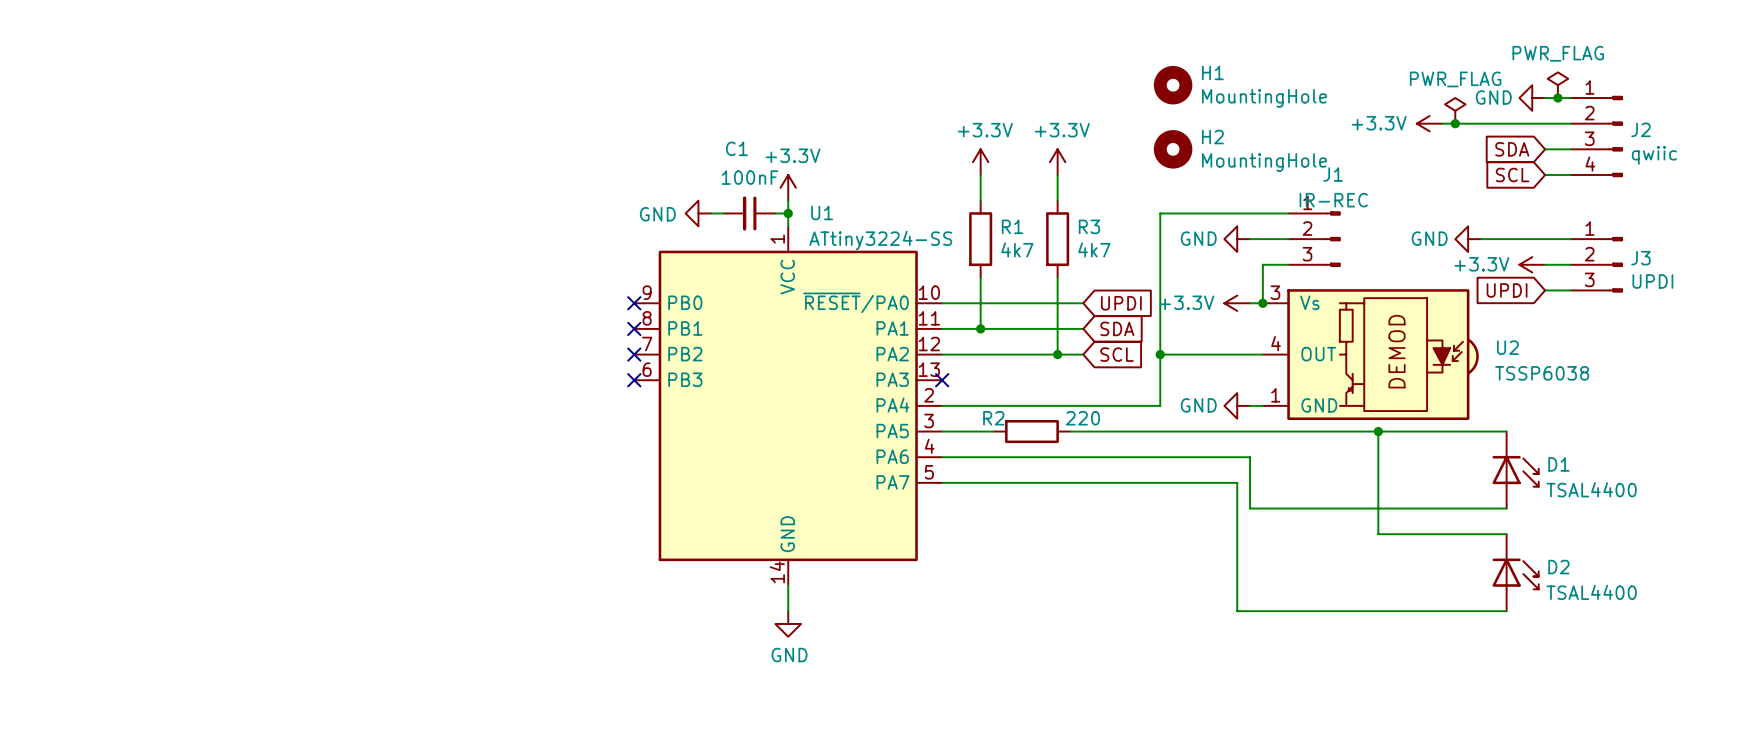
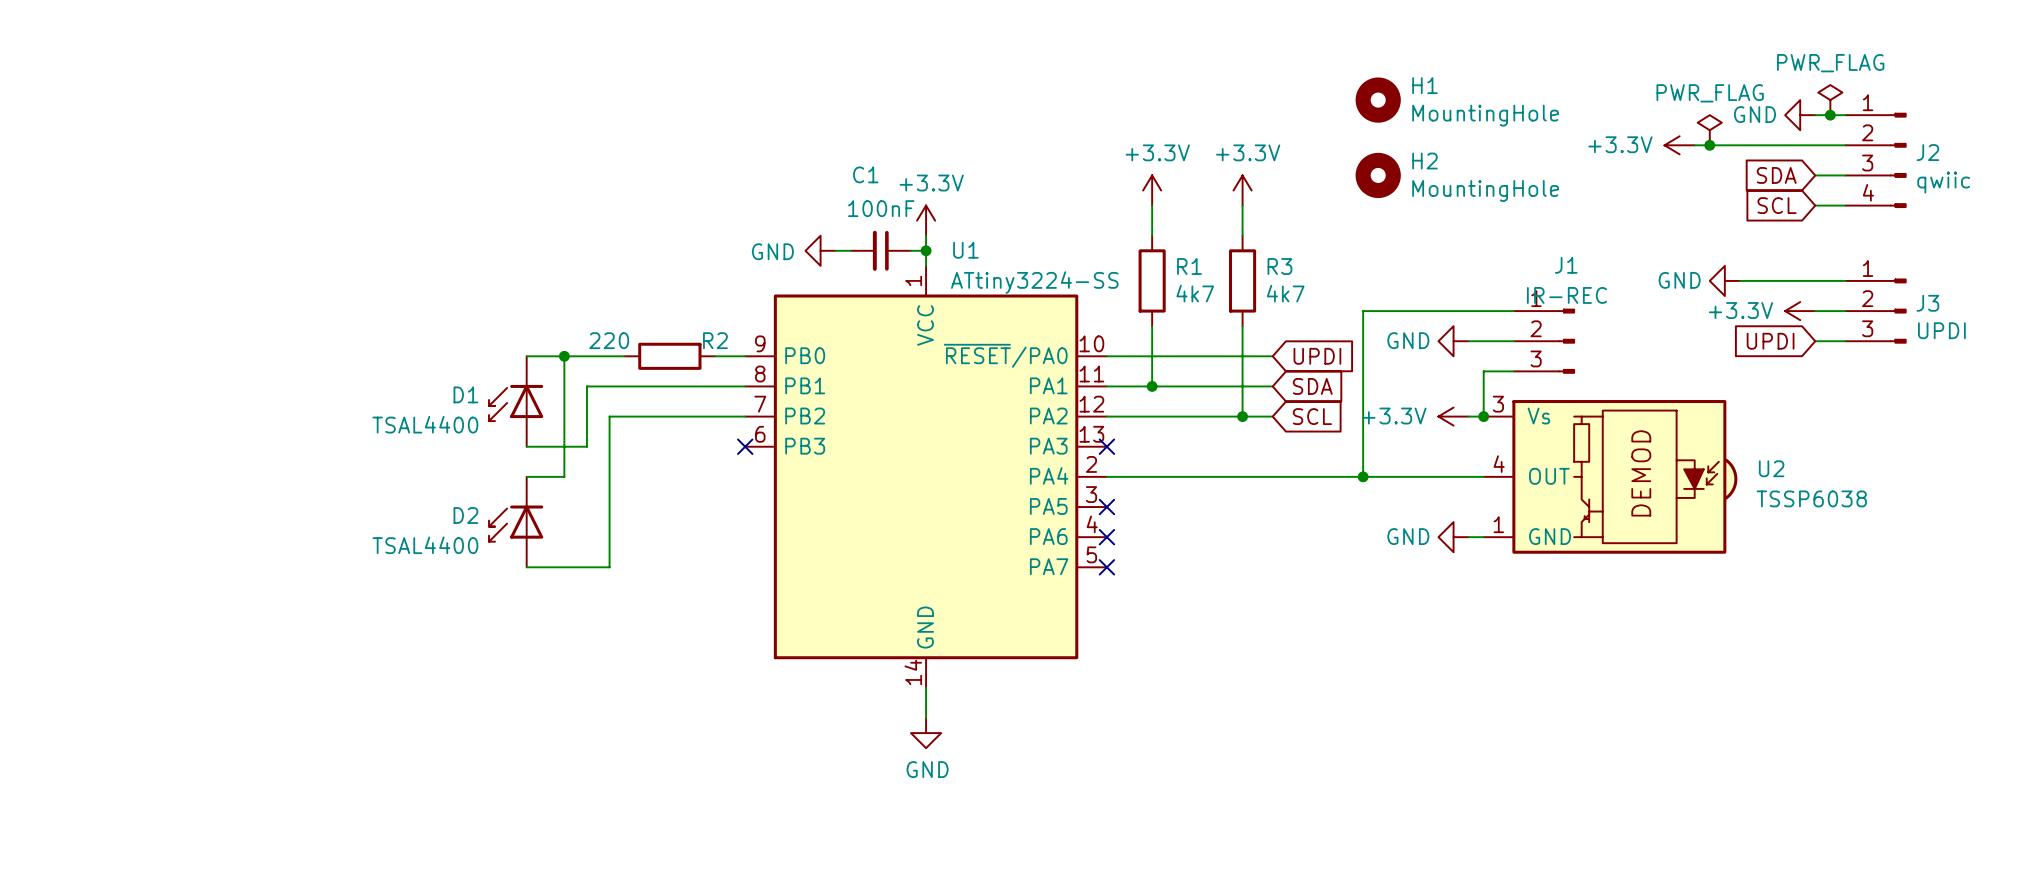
wire: (1288, 213) (1160, 213) (1160, 264) -> (1483, 311) (1363, 311)
power symbol position: GND (1237, 239) -> GND (1453, 341)
wire: (1250, 239) (1288, 239) -> (1468, 341) (1513, 341)
J1 position: (1314, 239) -> (1544, 341)
wire: (1262, 264) (1262, 303) (1250, 303) -> none
wire: none -> (526, 356) (624, 356)
wire: none -> (564, 356) (564, 476) (526, 476)
junction: none -> (564, 356)
wire: none -> (715, 356) (745, 356)
no-connect mark: (634, 303) -> none
power symbol position: +3.3V (1237, 303) -> +3.3V (1453, 416)
junction: (1262, 303) -> none
wire: none -> (1513, 371) (1483, 371) (1483, 416)
wire: none -> (745, 386) (586, 386) (586, 446) (526, 446)
no-connect mark: (634, 328) -> none
wire: none -> (745, 416) (609, 416) (609, 567) (526, 567)
no-connect mark: (634, 354) -> none
wire: (1160, 354) (1250, 354) -> (1363, 476) (1468, 476)
junction: (1160, 354) -> none
junction: none -> (1483, 416)
U2 position: (1370, 354) -> (1610, 476)
junction: none -> (1363, 476)
power symbol position: GND (1237, 405) -> GND (1453, 537)
R2 name position: R2 (993, 418) -> R2 (715, 340)
R2 value position: 220 (1082, 418) -> 220 (609, 340)
wire: (942, 431) (993, 431) -> none
no-connect mark: none -> (1106, 507)
R2 position: (1031, 431) -> (669, 356)
wire: (1070, 431) (1506, 431) -> none
wire: (1378, 431) (1378, 534) (1506, 534) -> none
junction: (1378, 431) -> none
wire: (942, 457) (1250, 457) (1250, 508) (1506, 508) -> none
no-connect mark: none -> (1106, 537)
wire: none -> (1468, 537) (1483, 537)
D1 position: (1515, 470) -> (516, 401)
D1 flip: as is (1515, 471) -> left-right (516, 403)
wire: (942, 482) (1237, 482) (1237, 611) (1506, 611) -> none
no-connect mark: none -> (1106, 567)
D2 position: (1515, 572) -> (516, 522)
D2 flip: as is (1515, 573) -> left-right (516, 523)

